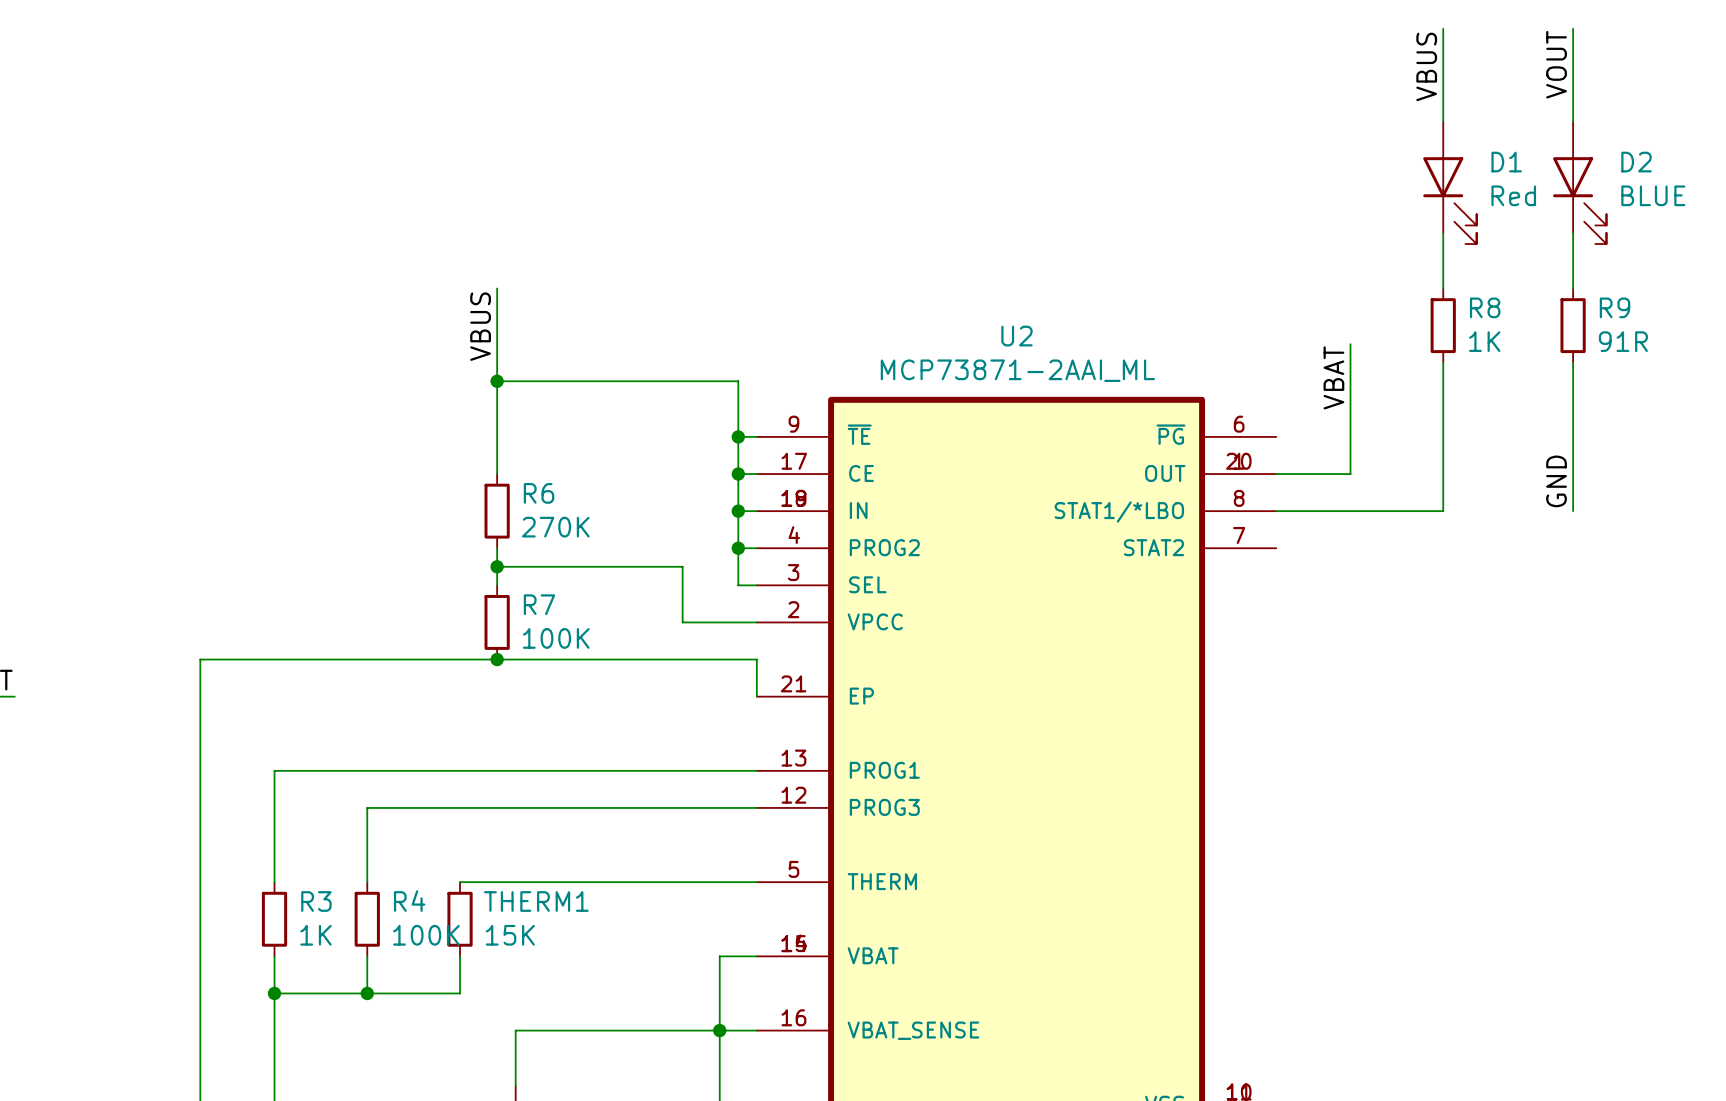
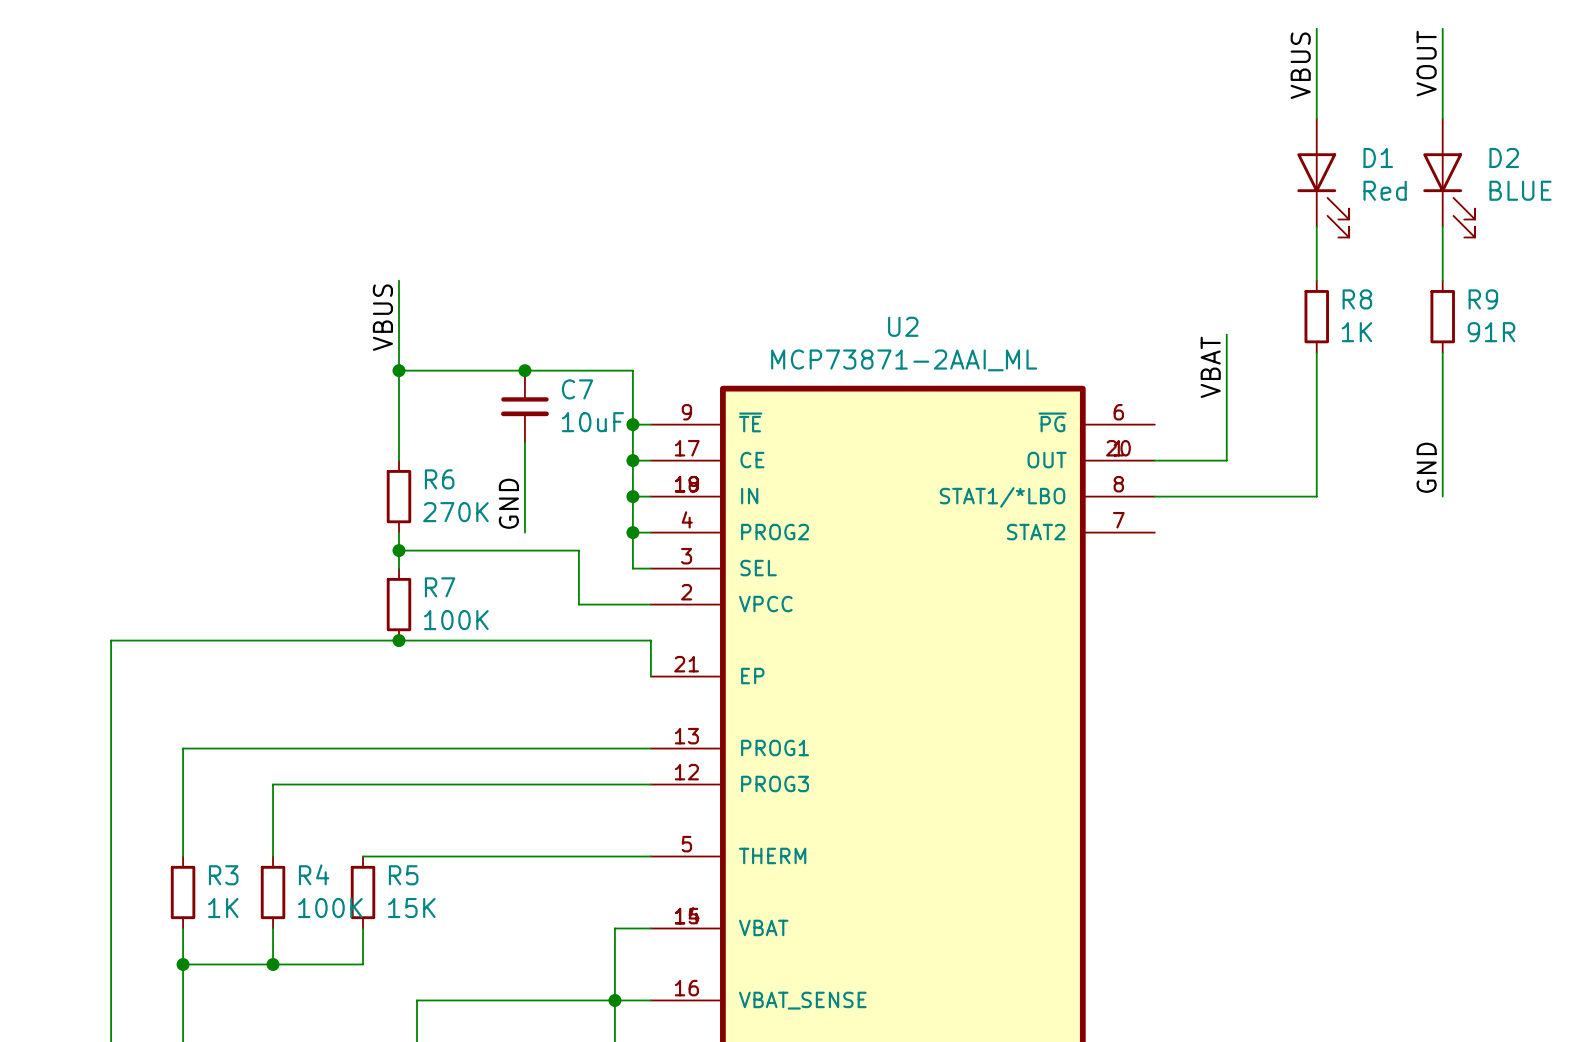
junction: none -> (524, 370)
C7: none -> 10uF (524, 406)
wire: none -> (524, 442) (524, 532)
label: none -> GND (508, 503)
THERM1 name: THERM1 (536, 901) -> R5 (403, 875)

